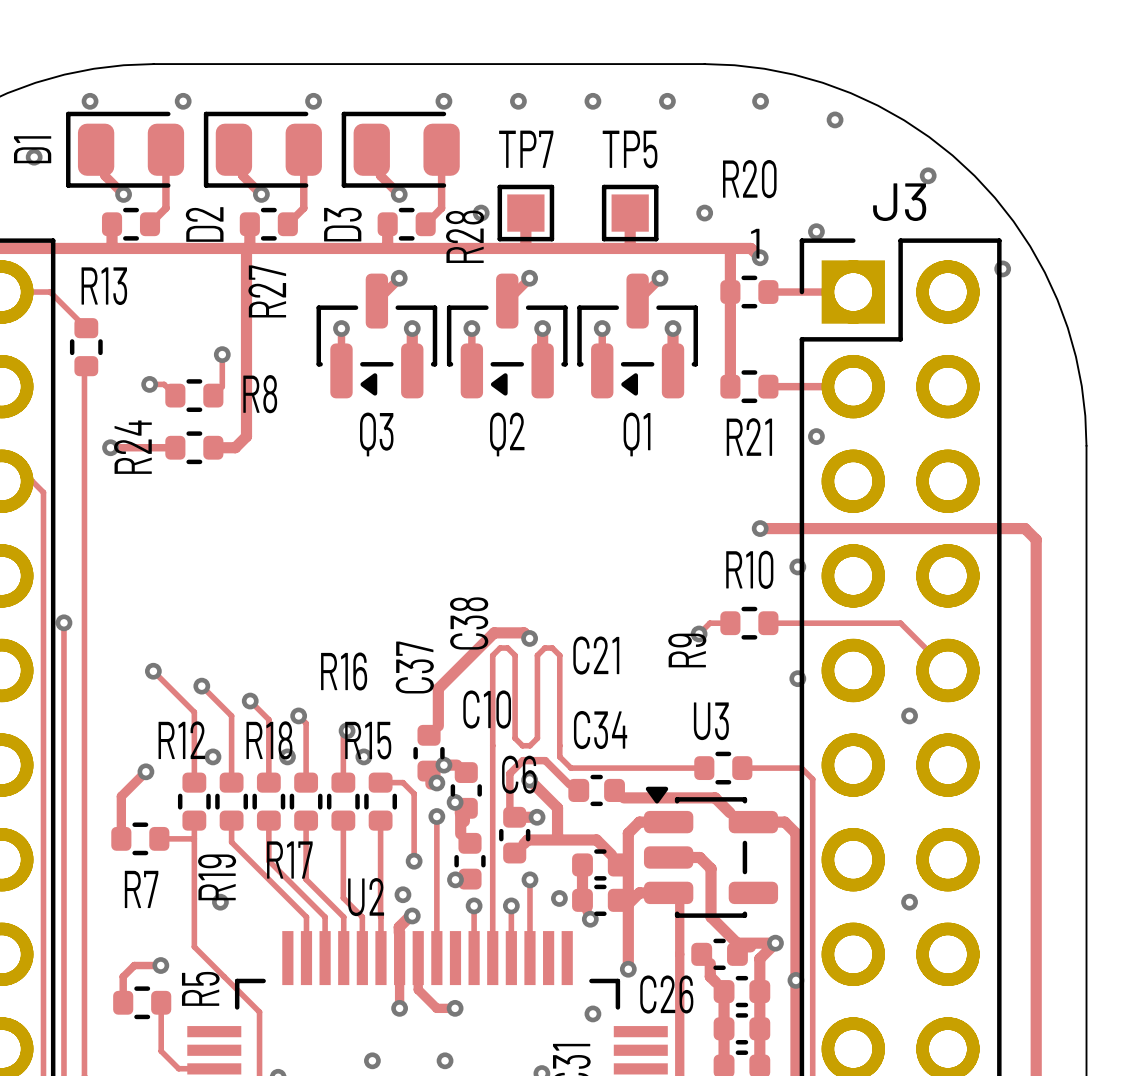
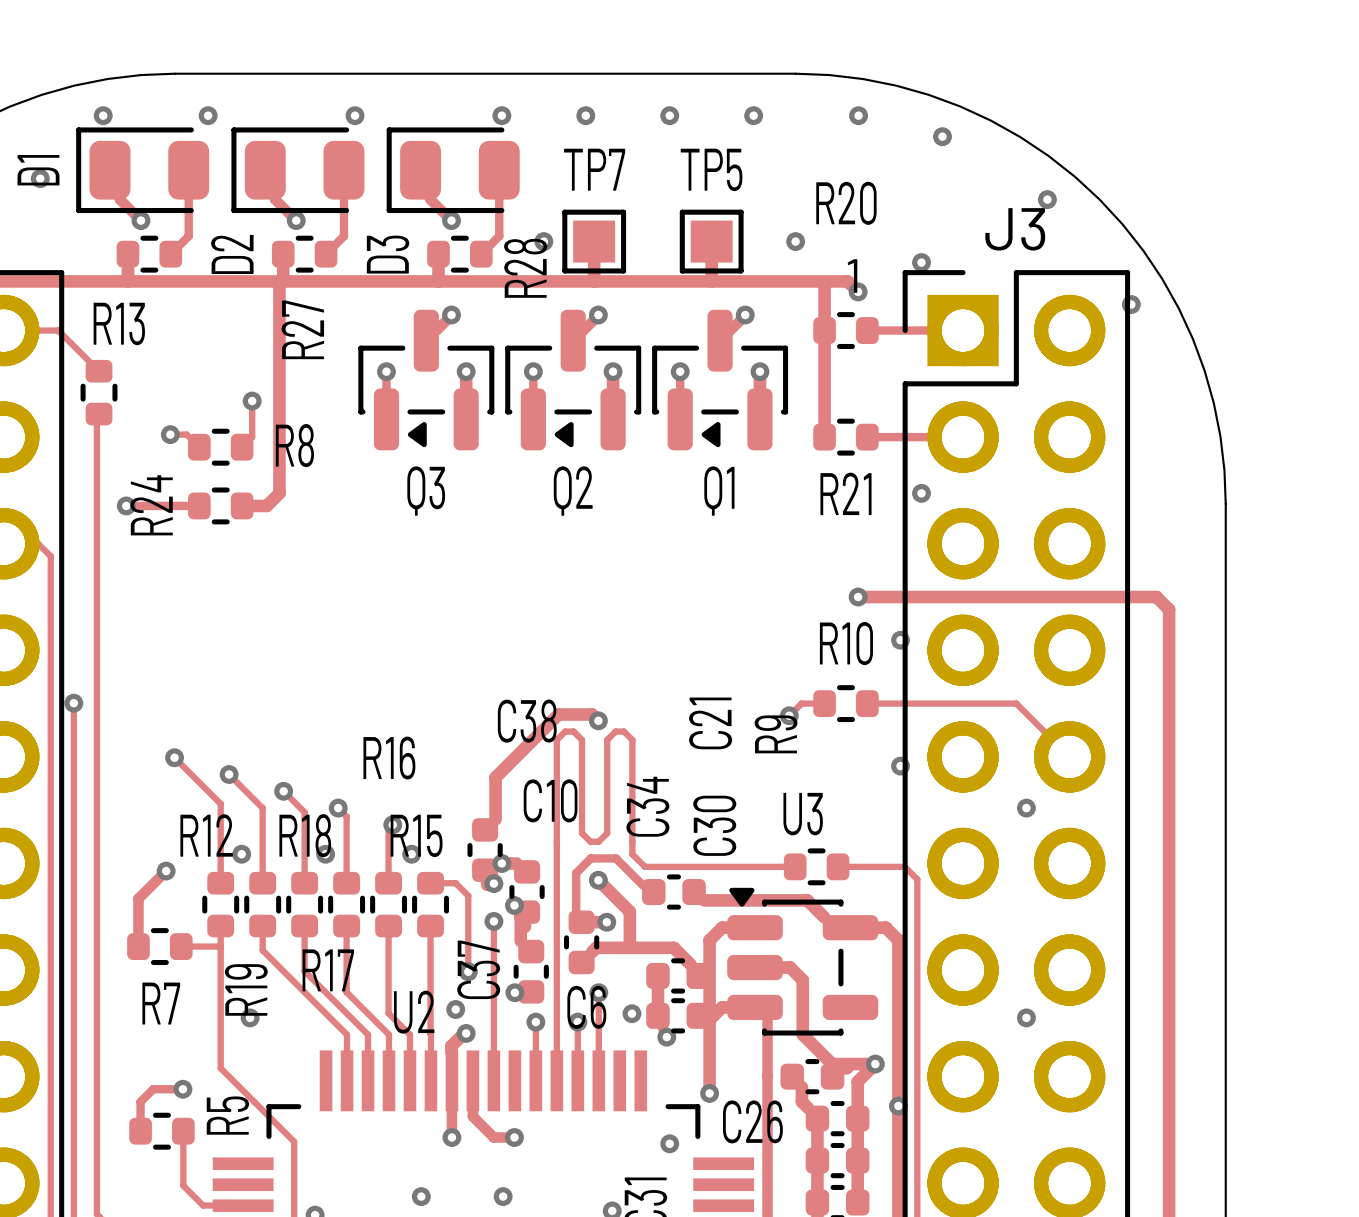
C38 name rotation: 0° (469, 623) -> 90° clockwise (527, 721)
C21 name rotation: 0° (596, 655) -> 90° counterclockwise (710, 723)
C37 name position: C37 (414, 667) -> C37 (478, 969)
C34 name rotation: 0° (600, 730) -> 90° counterclockwise (647, 806)
C30 name: none -> C30 (714, 825)
C6 name position: C6 (519, 774) -> C6 (586, 1007)

